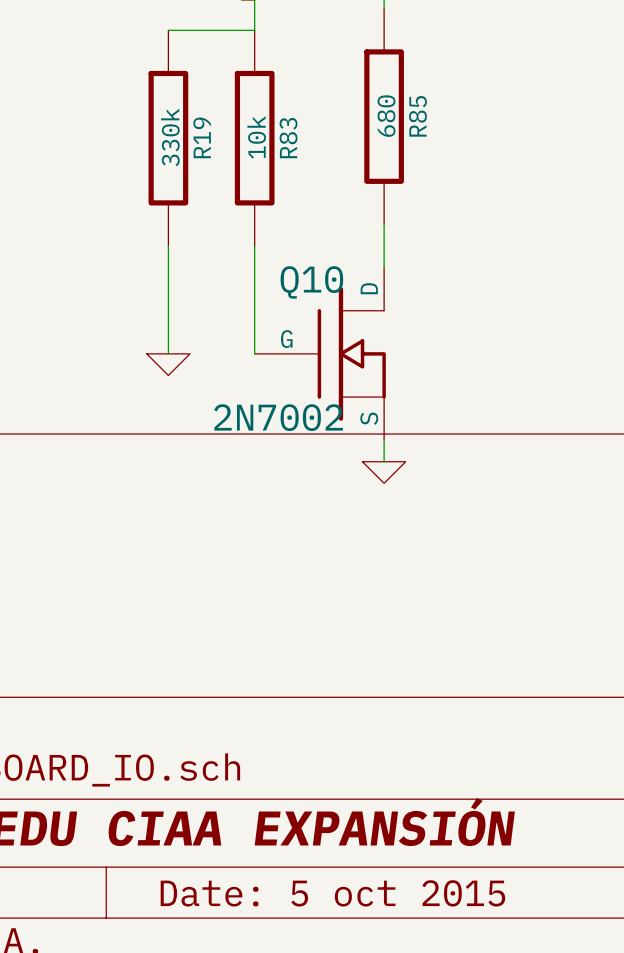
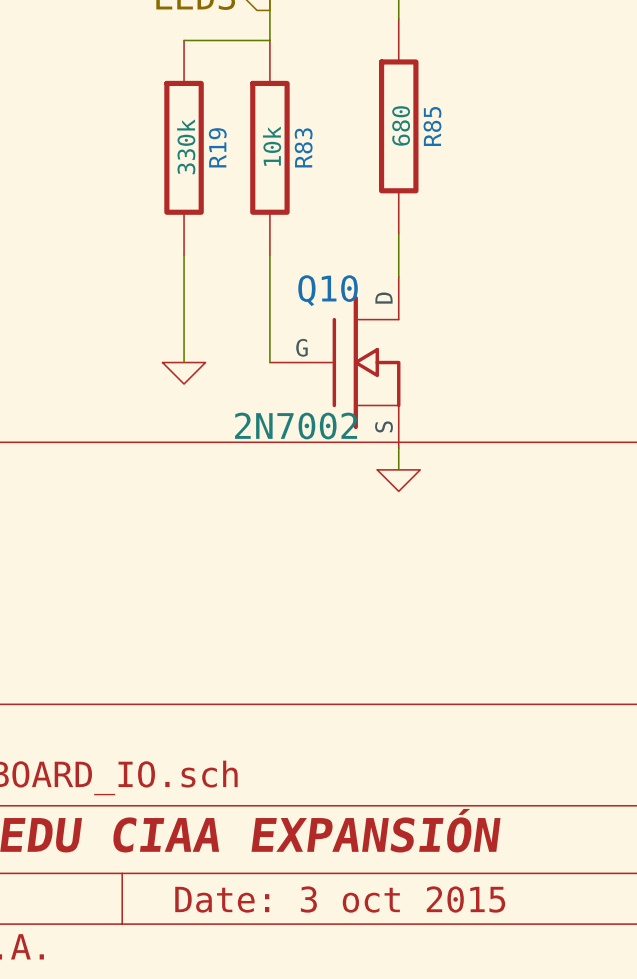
title block: Date: 5 oct 2015 (332, 893) -> Date: 3 oct 2015 (340, 899)

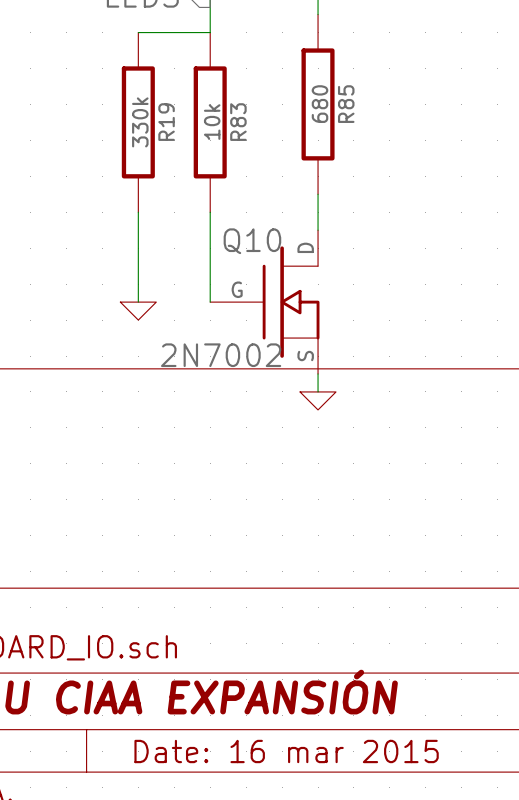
title block: Date: 3 oct 2015 (340, 899) -> Date: 16 mar 2015 (286, 751)

